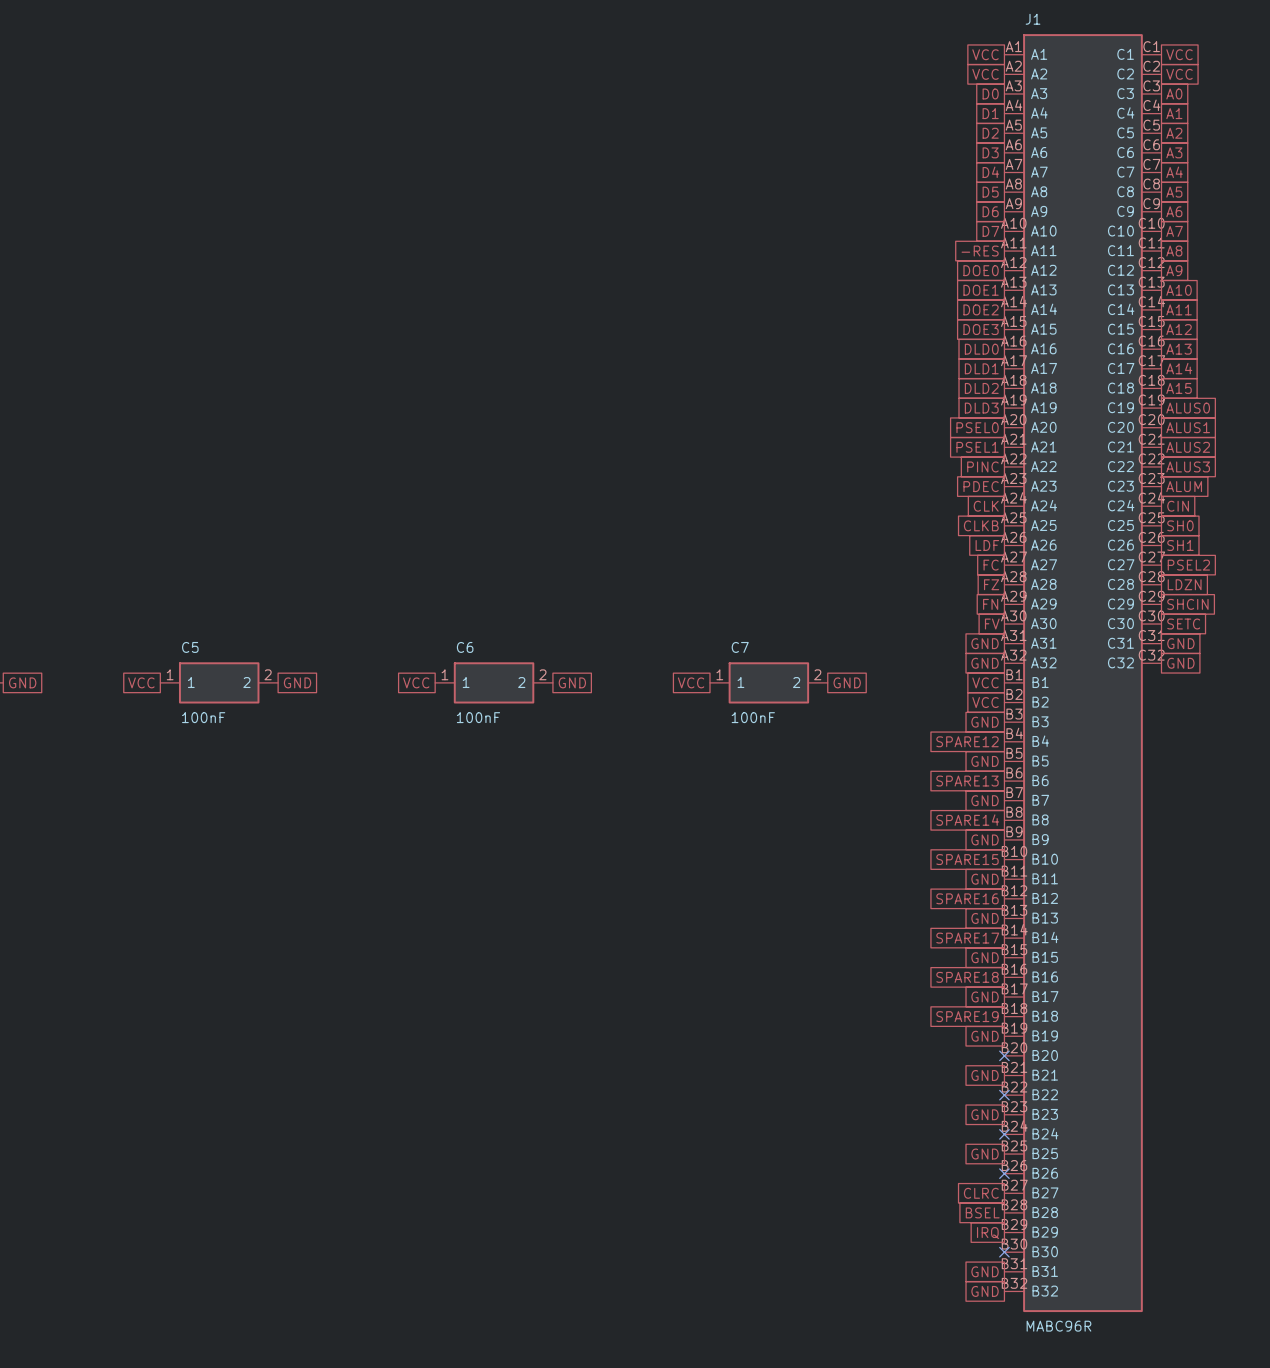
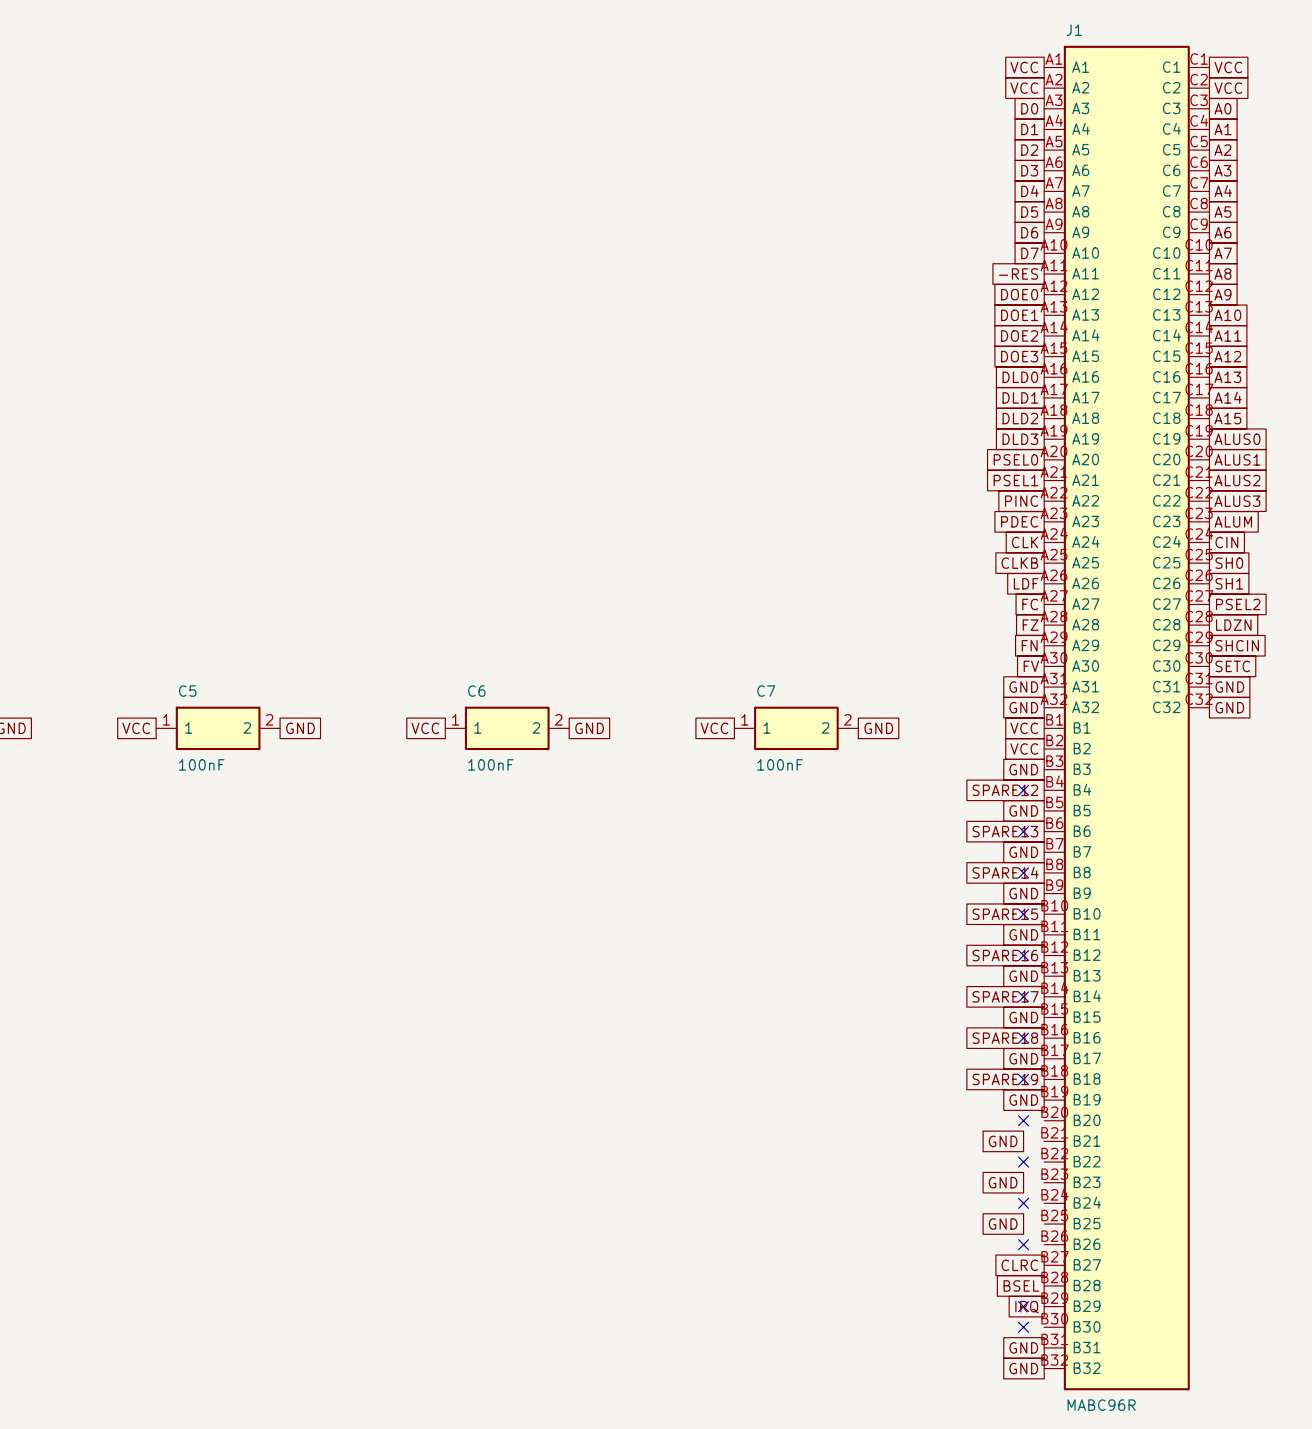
no-connect mark: none -> (1023, 790)
no-connect mark: none -> (1023, 831)
no-connect mark: none -> (1023, 872)
no-connect mark: none -> (1023, 914)
no-connect mark: none -> (1023, 955)
no-connect mark: none -> (1023, 996)
no-connect mark: none -> (1023, 1038)
no-connect mark: none -> (1023, 1079)
no-connect mark position: (1004, 1055) -> (1023, 1120)
global label position: GND (985, 1075) -> GND (1003, 1141)
no-connect mark position: (1004, 1095) -> (1023, 1162)
global label position: GND (985, 1114) -> GND (1003, 1182)
no-connect mark position: (1004, 1134) -> (1023, 1203)
global label position: GND (985, 1154) -> GND (1003, 1224)
no-connect mark position: (1004, 1173) -> (1023, 1244)
no-connect mark: none -> (1023, 1306)
no-connect mark: none -> (1023, 1327)
no-connect mark: (1004, 1252) -> none

